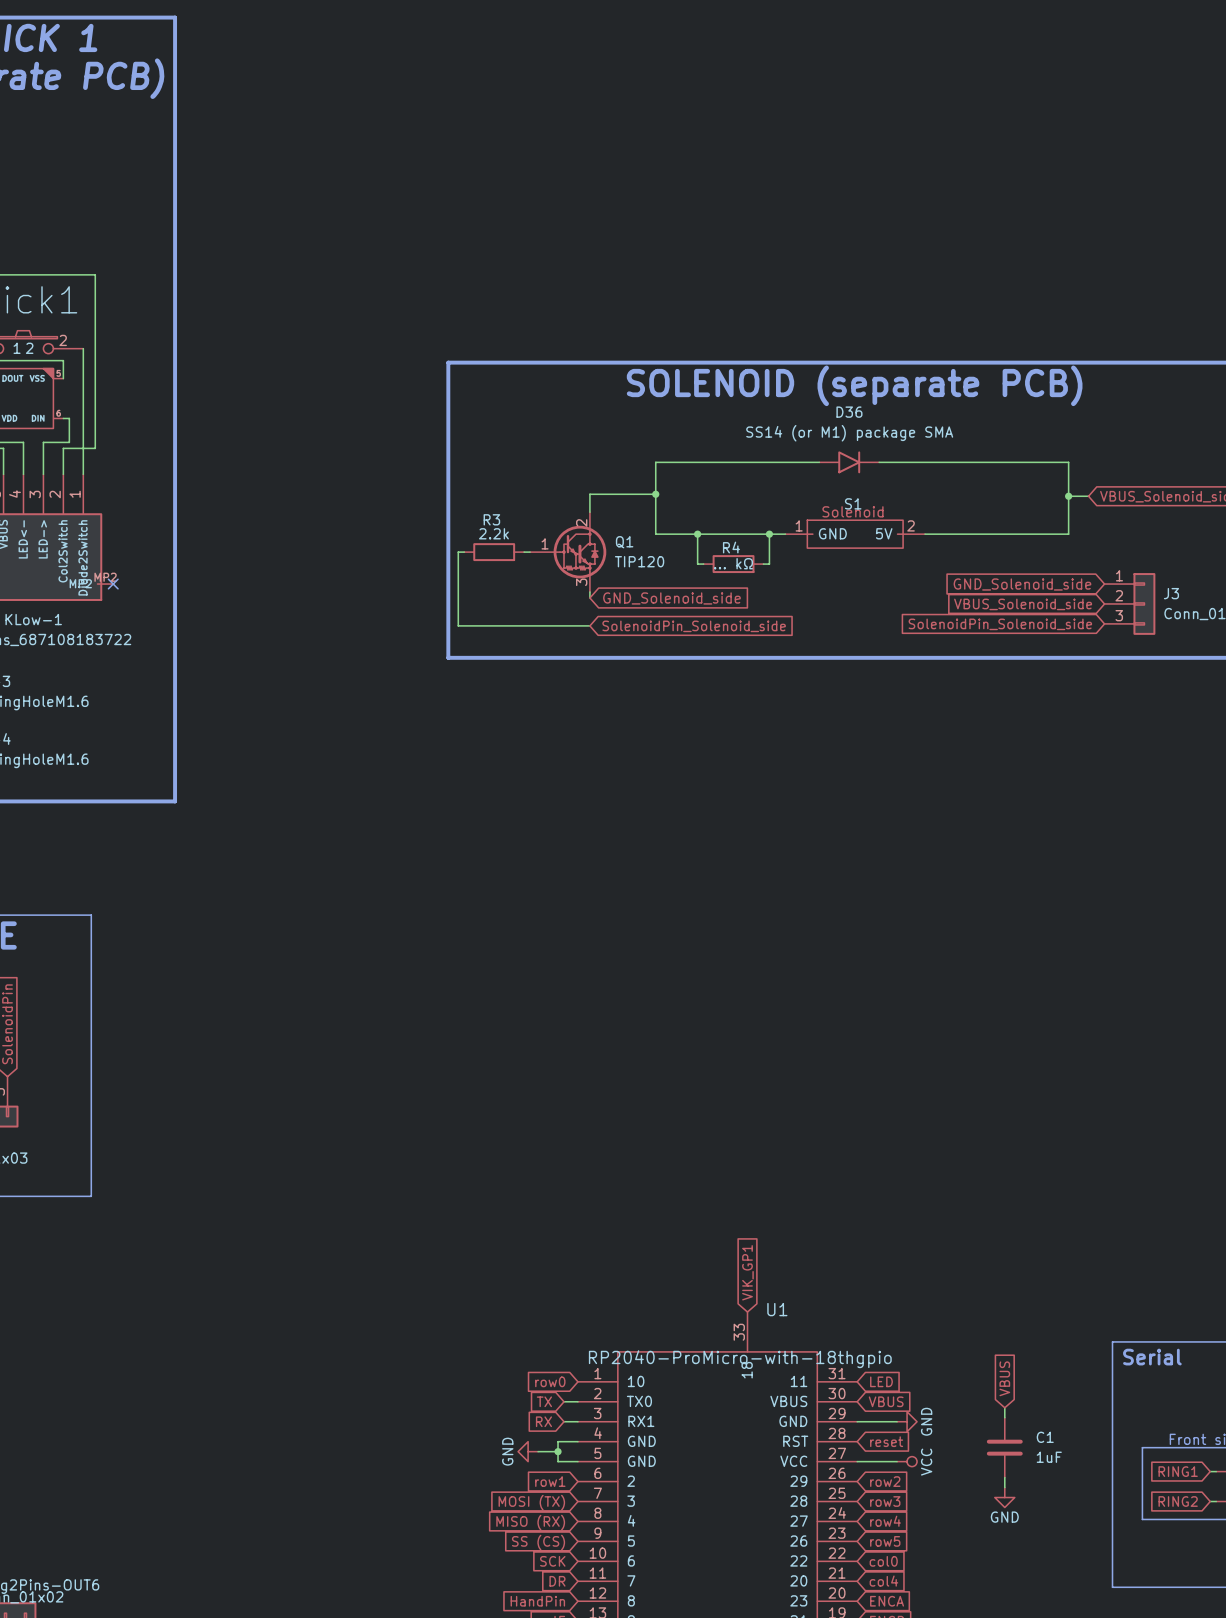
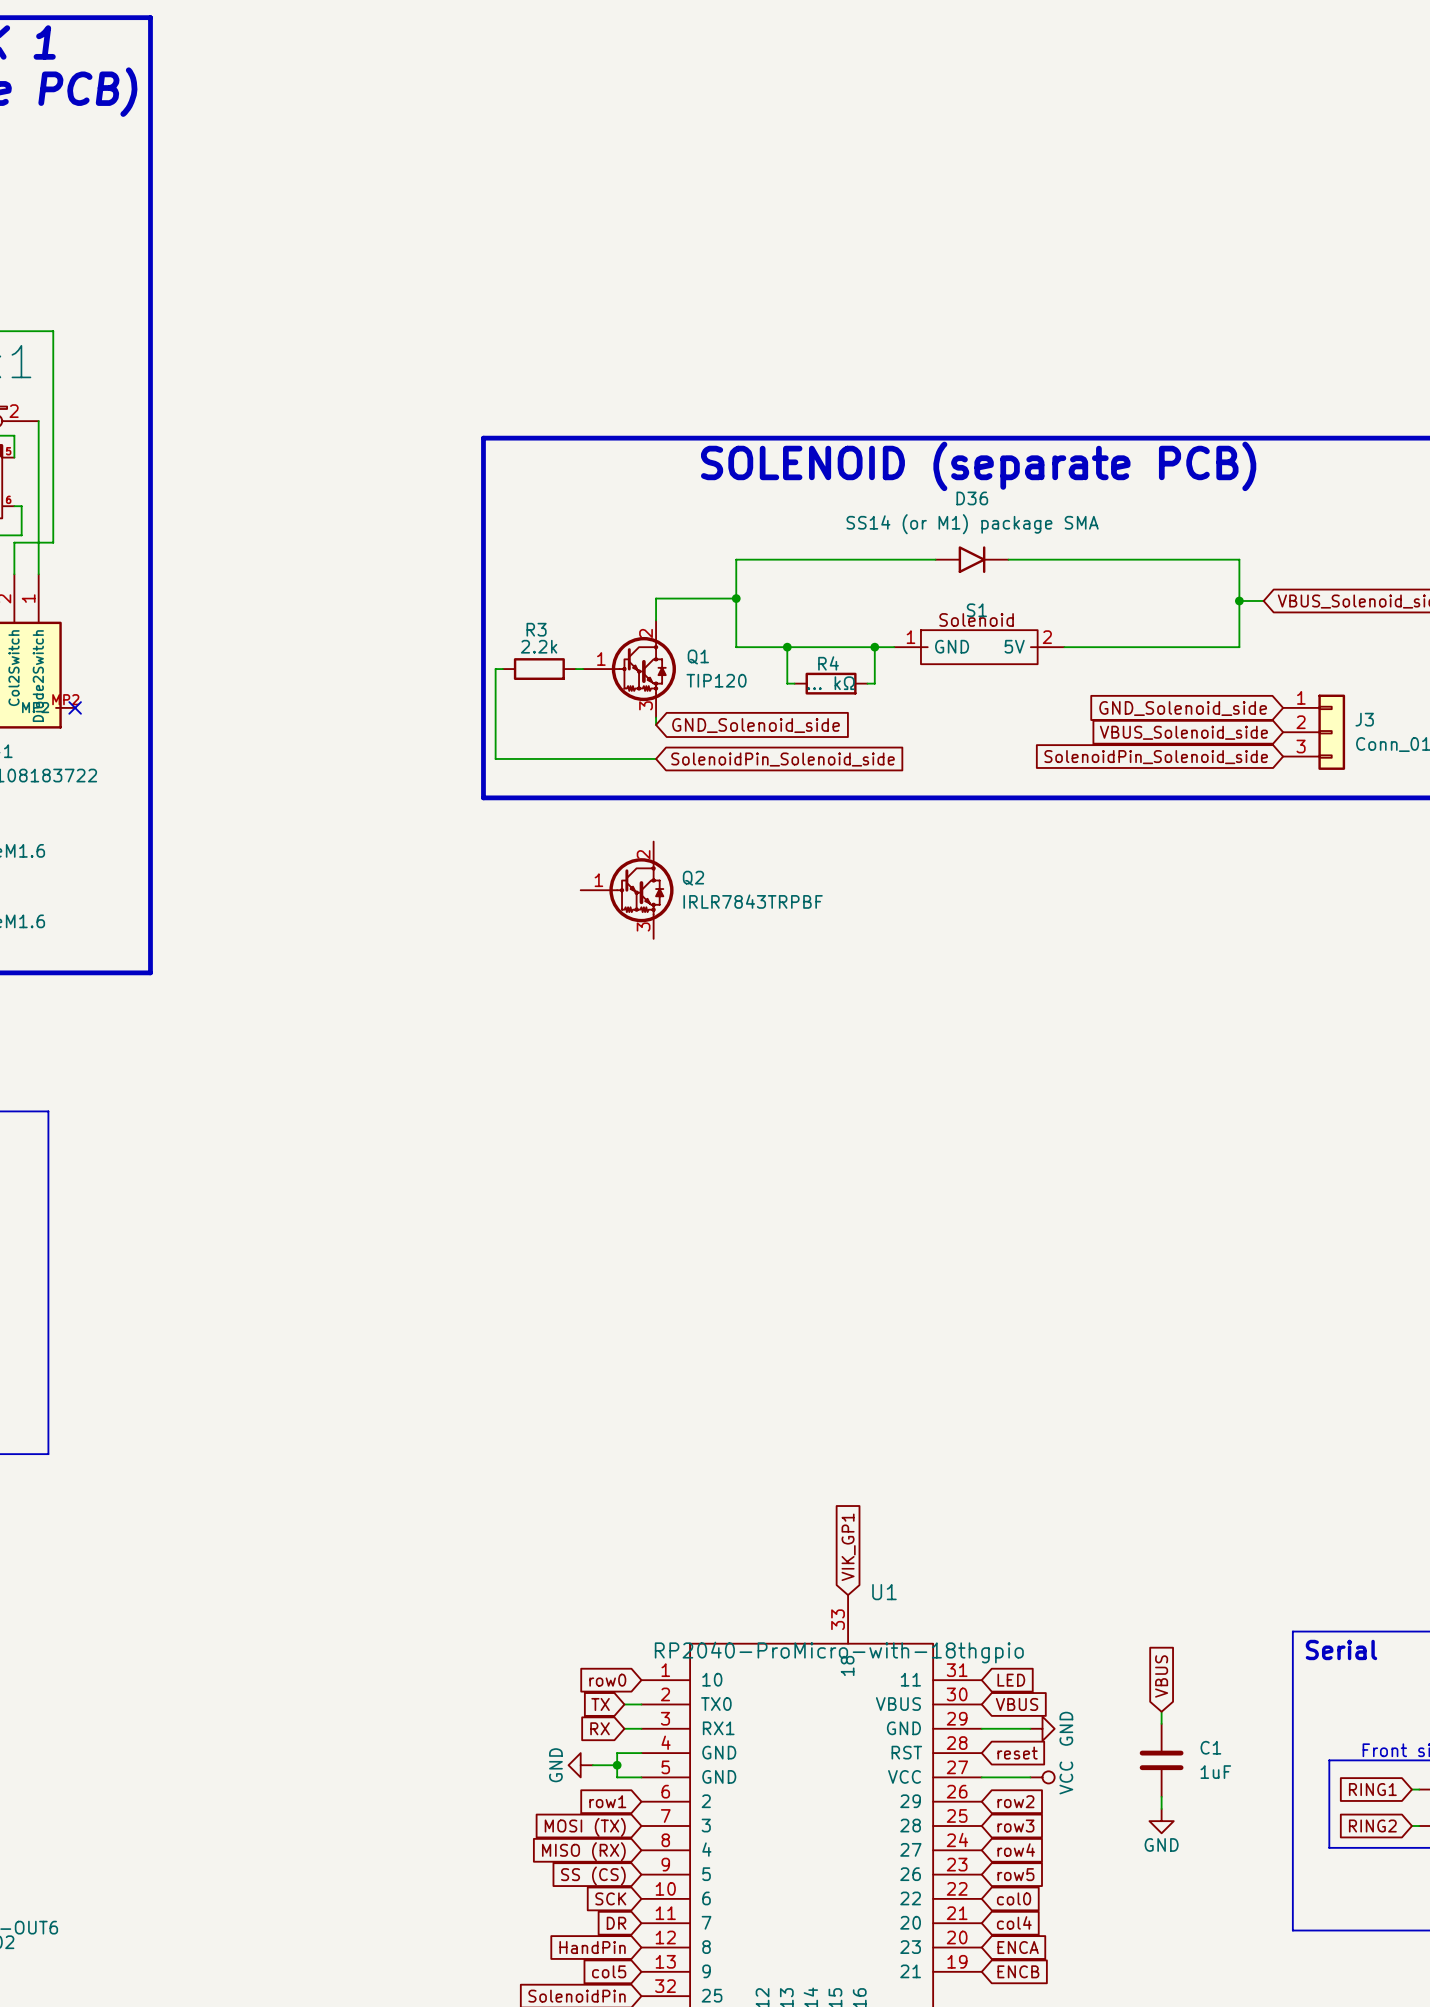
Q2: none -> IRLR7843TRPBF (627, 890)

